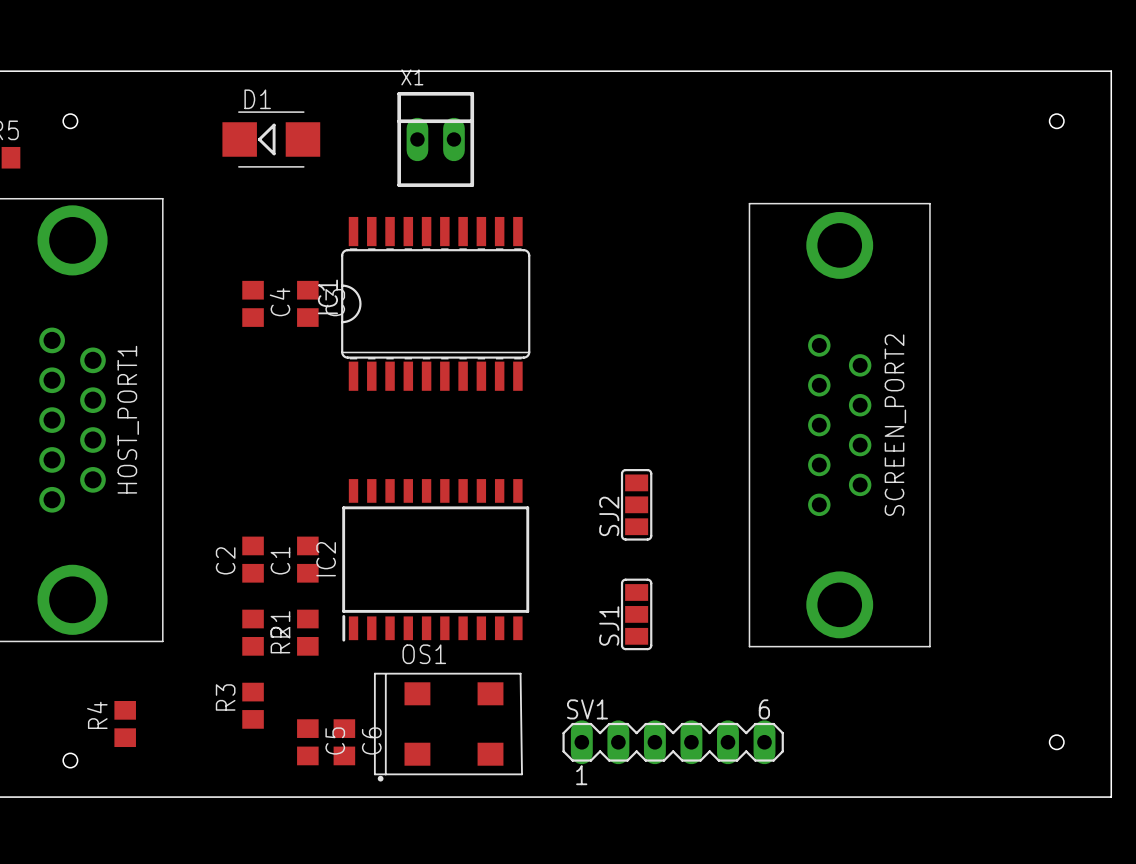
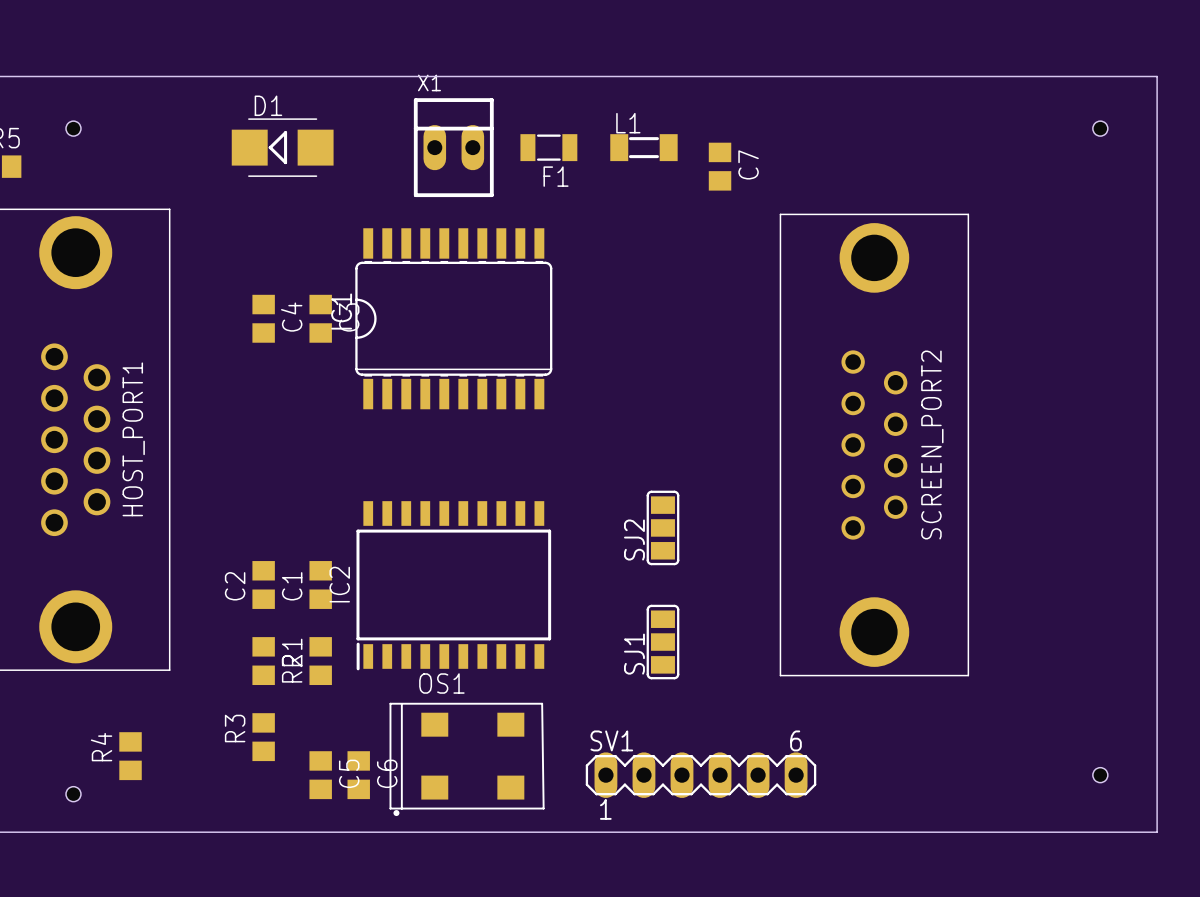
F1: none -> (548, 147)
L1: none -> (643, 147)
C7: none -> (720, 166)

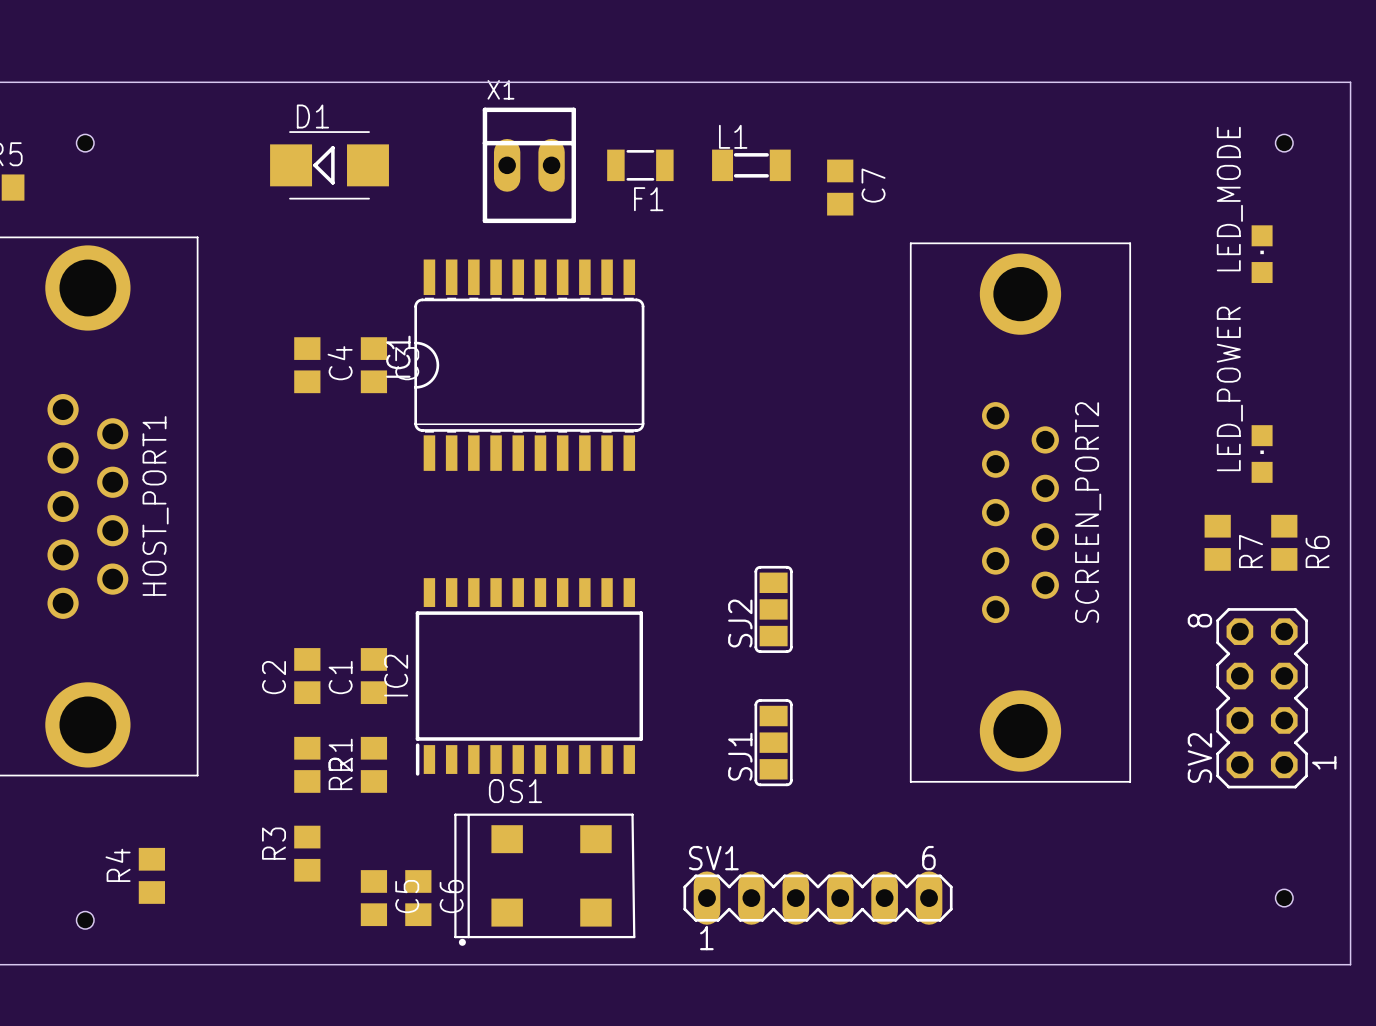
LED_MODE: none -> (1262, 254)
LED_POWER: none -> (1262, 454)
R7: none -> (1217, 542)
R6: none -> (1284, 542)
SV2: none -> (1262, 698)

